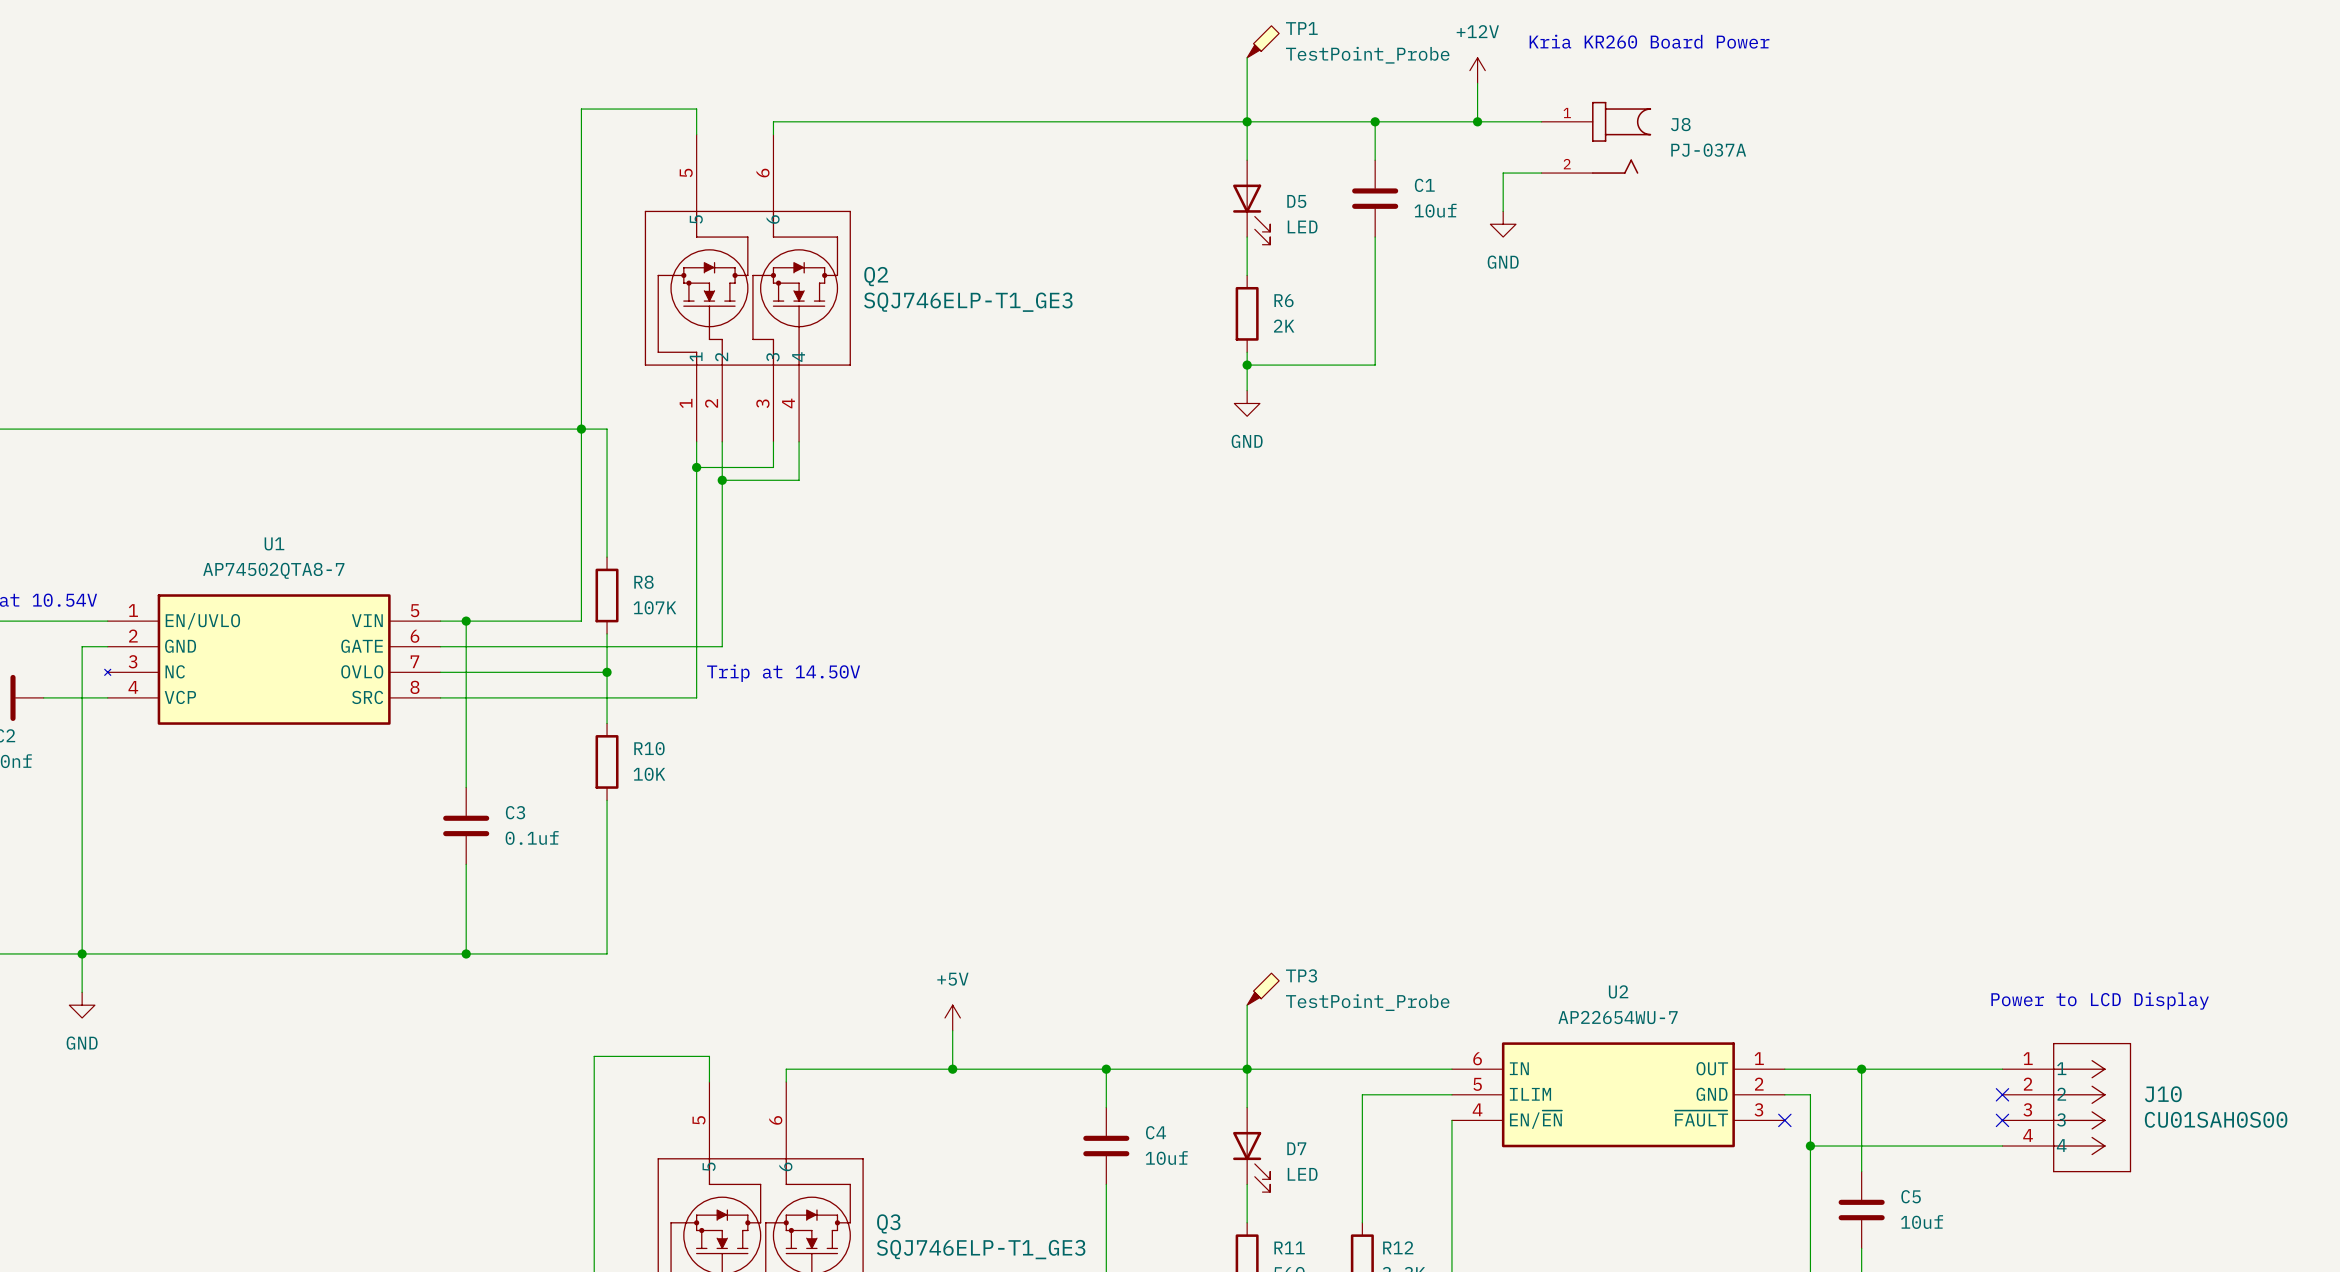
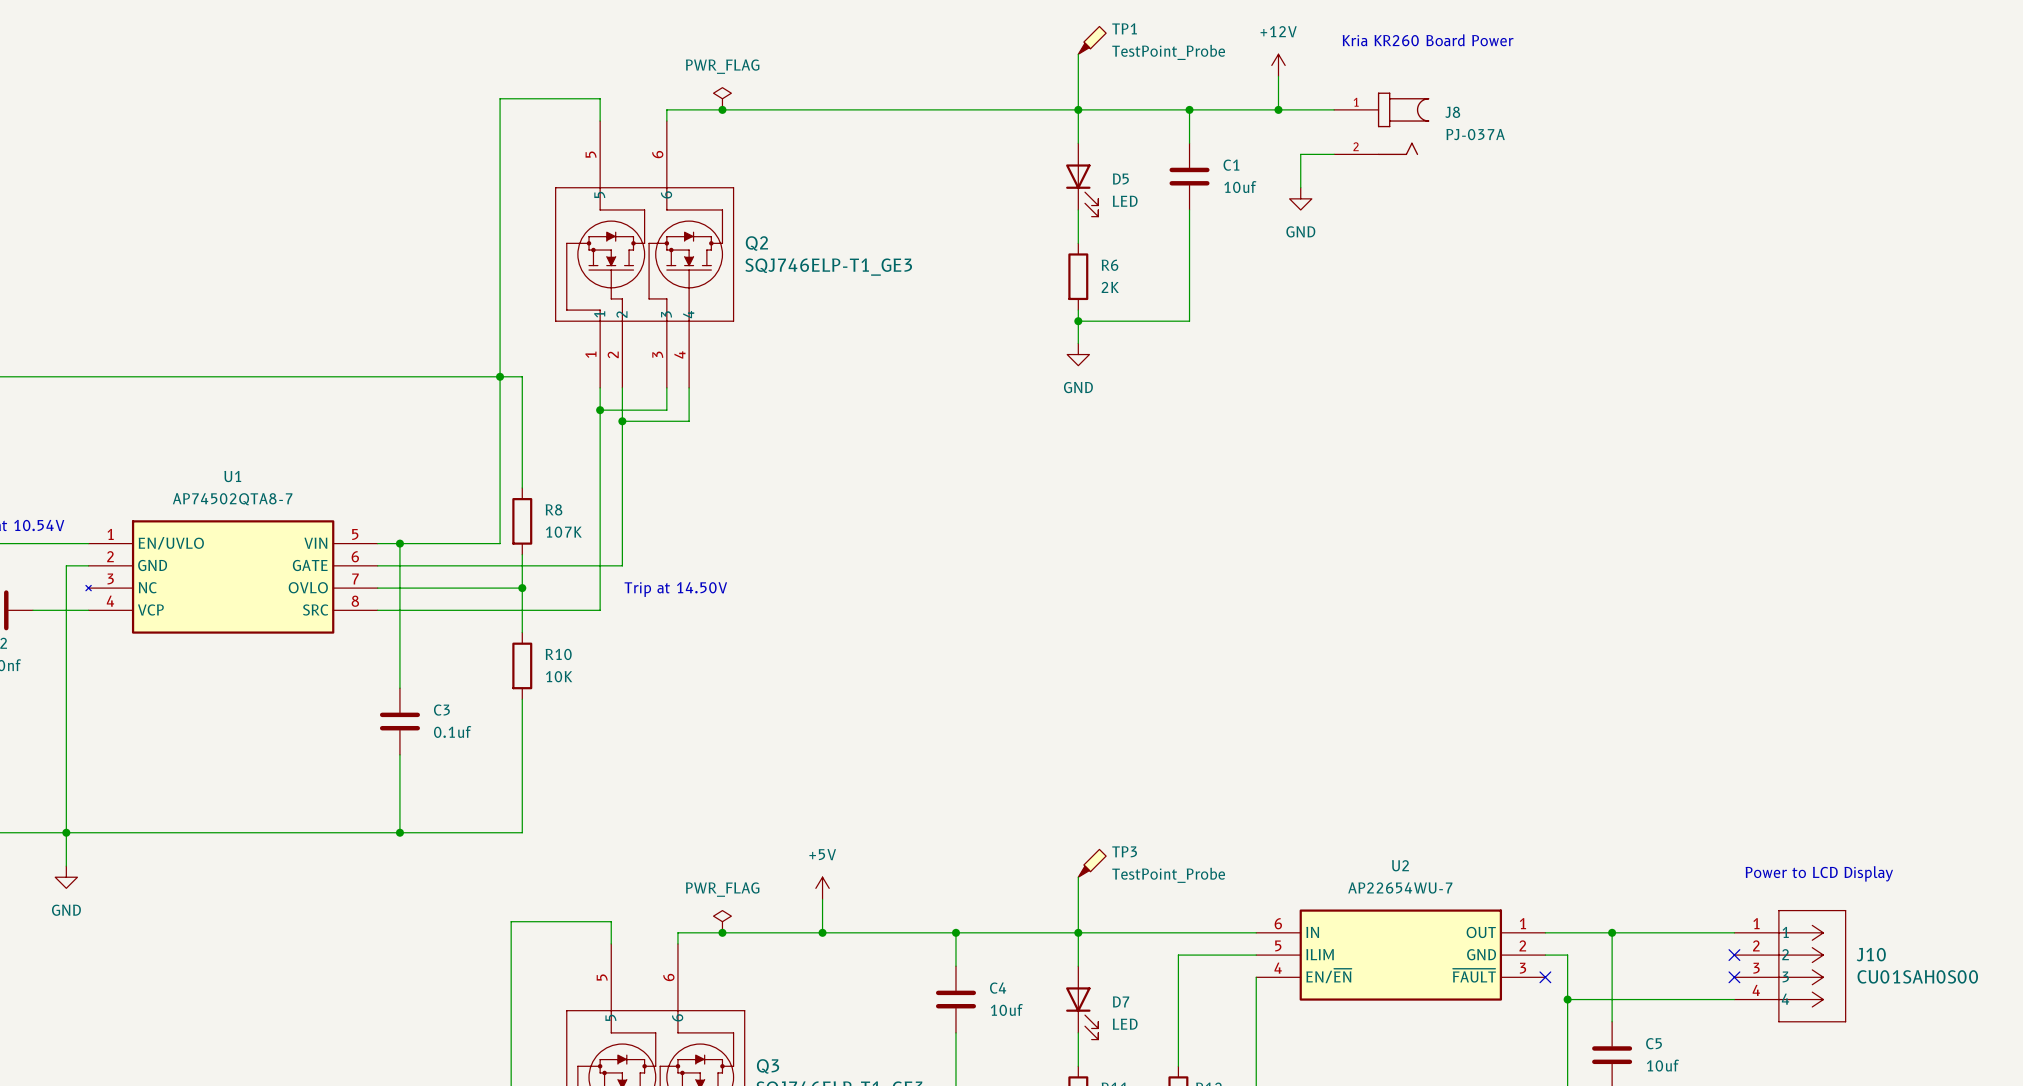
power symbol: none -> PWR_FLAG (722, 98)
junction: none -> (722, 109)
power symbol: none -> PWR_FLAG (722, 921)
junction: none -> (722, 932)

